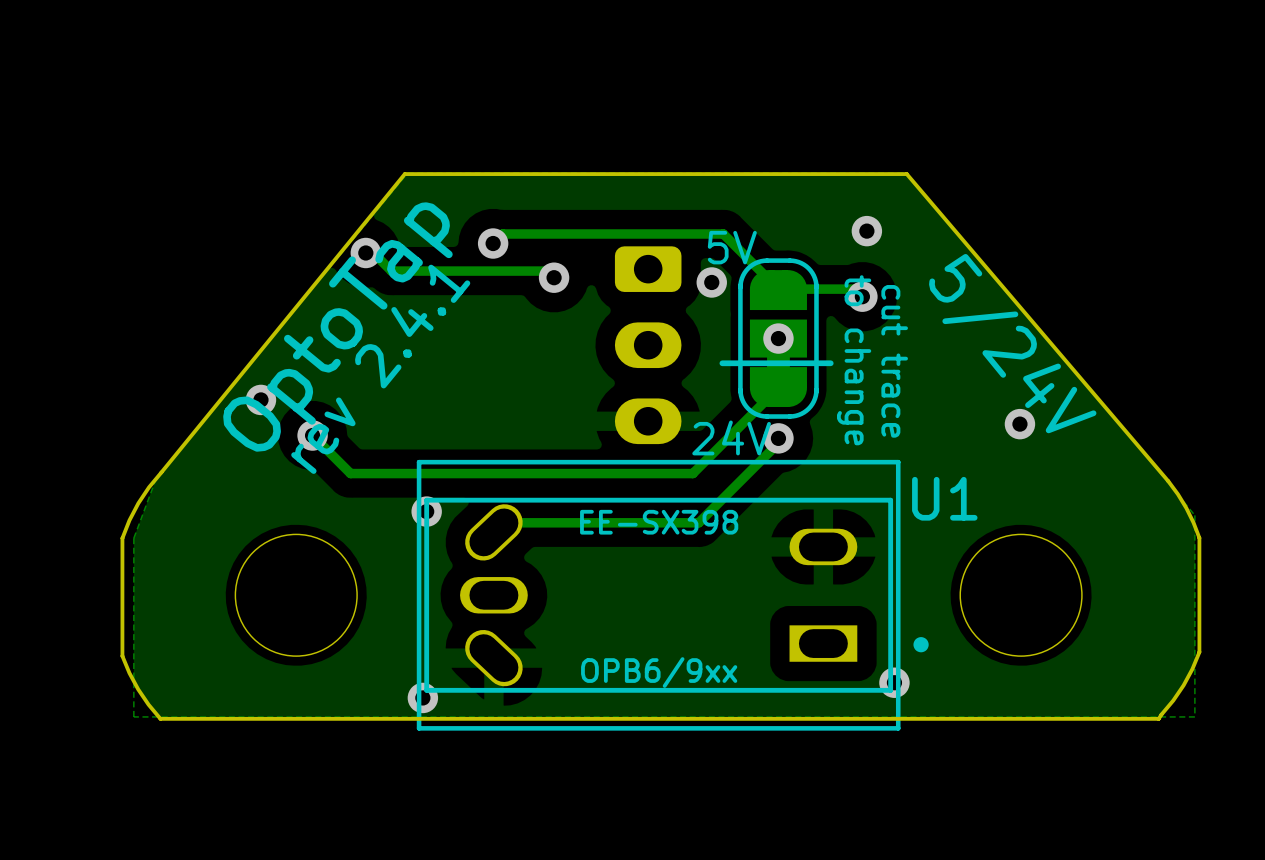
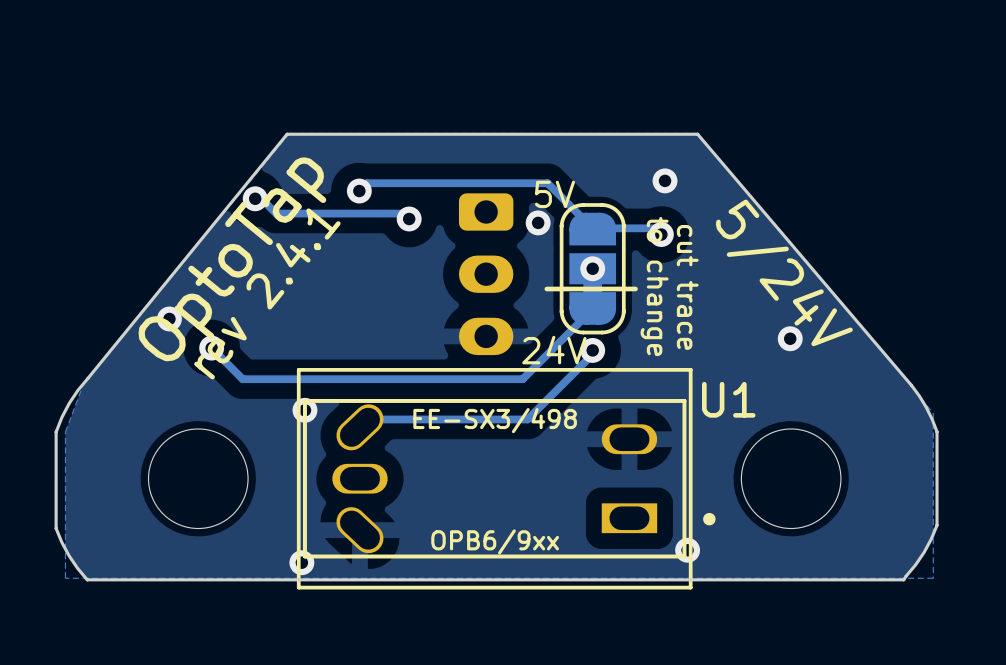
U1 text: EE-SX398 (659, 522) -> EE-SX3/498 (495, 420)

